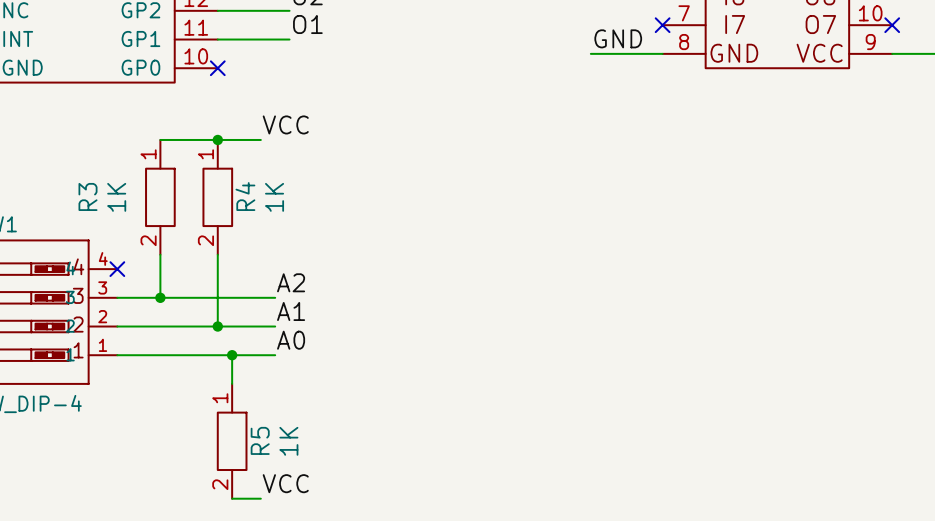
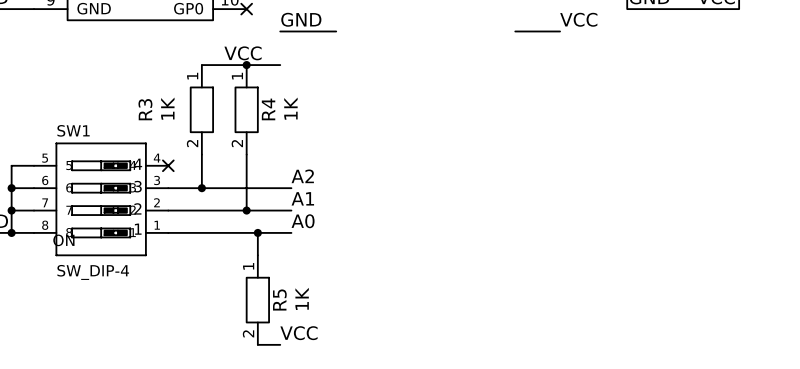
label: none -> GND (301, 19)
label: none -> VCC (578, 19)
wire: none -> (280, 31) (336, 31)
wire: none -> (515, 31) (560, 31)
label position: VCC (285, 124) -> VCC (243, 53)

